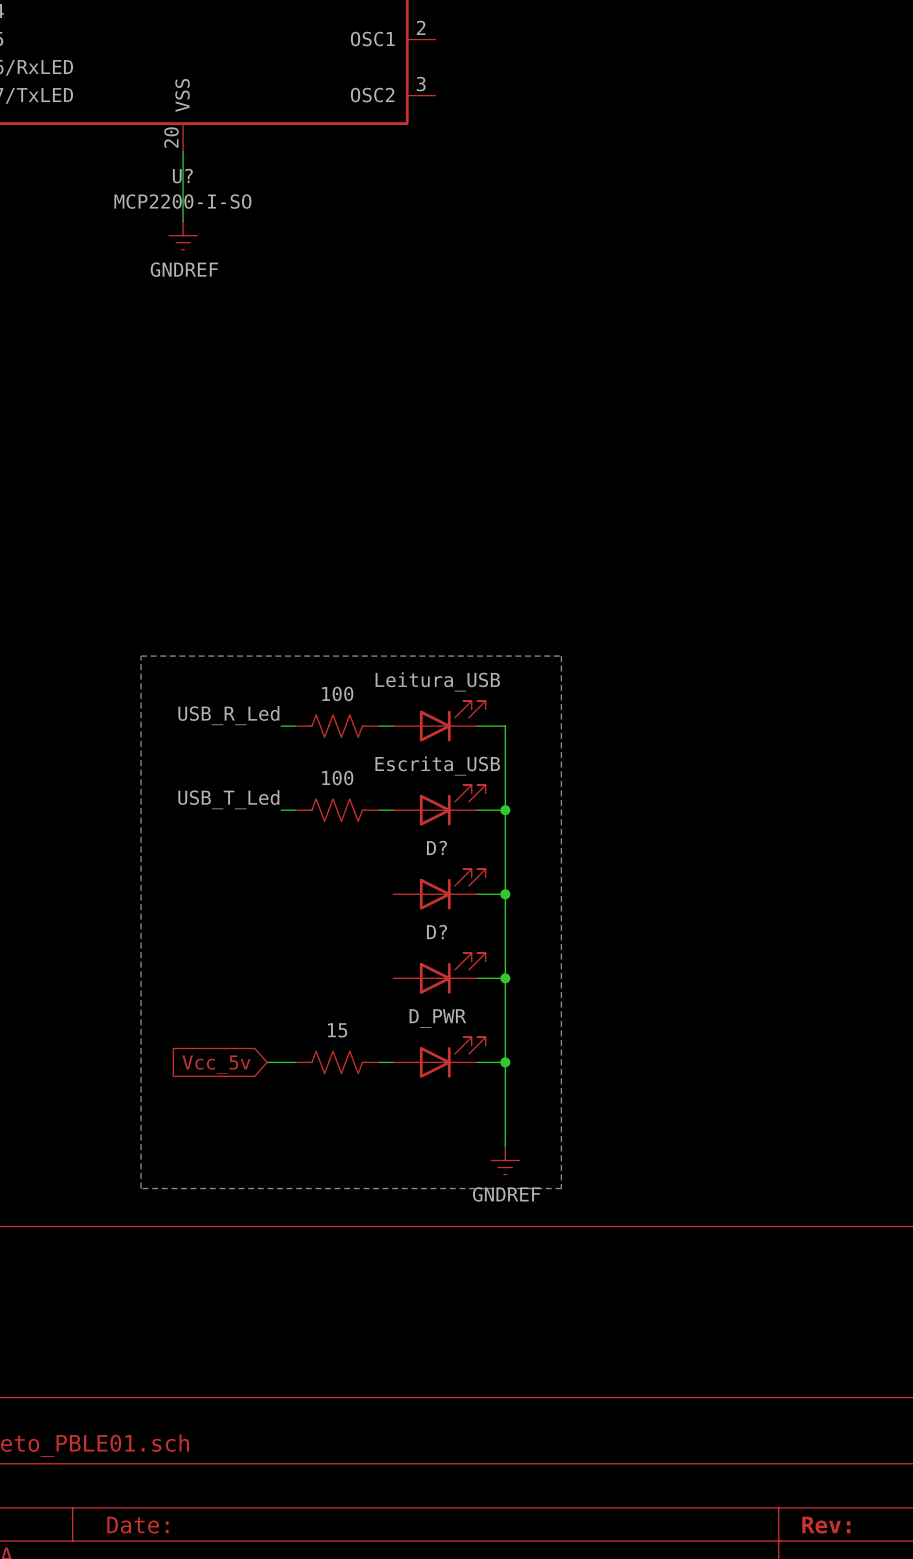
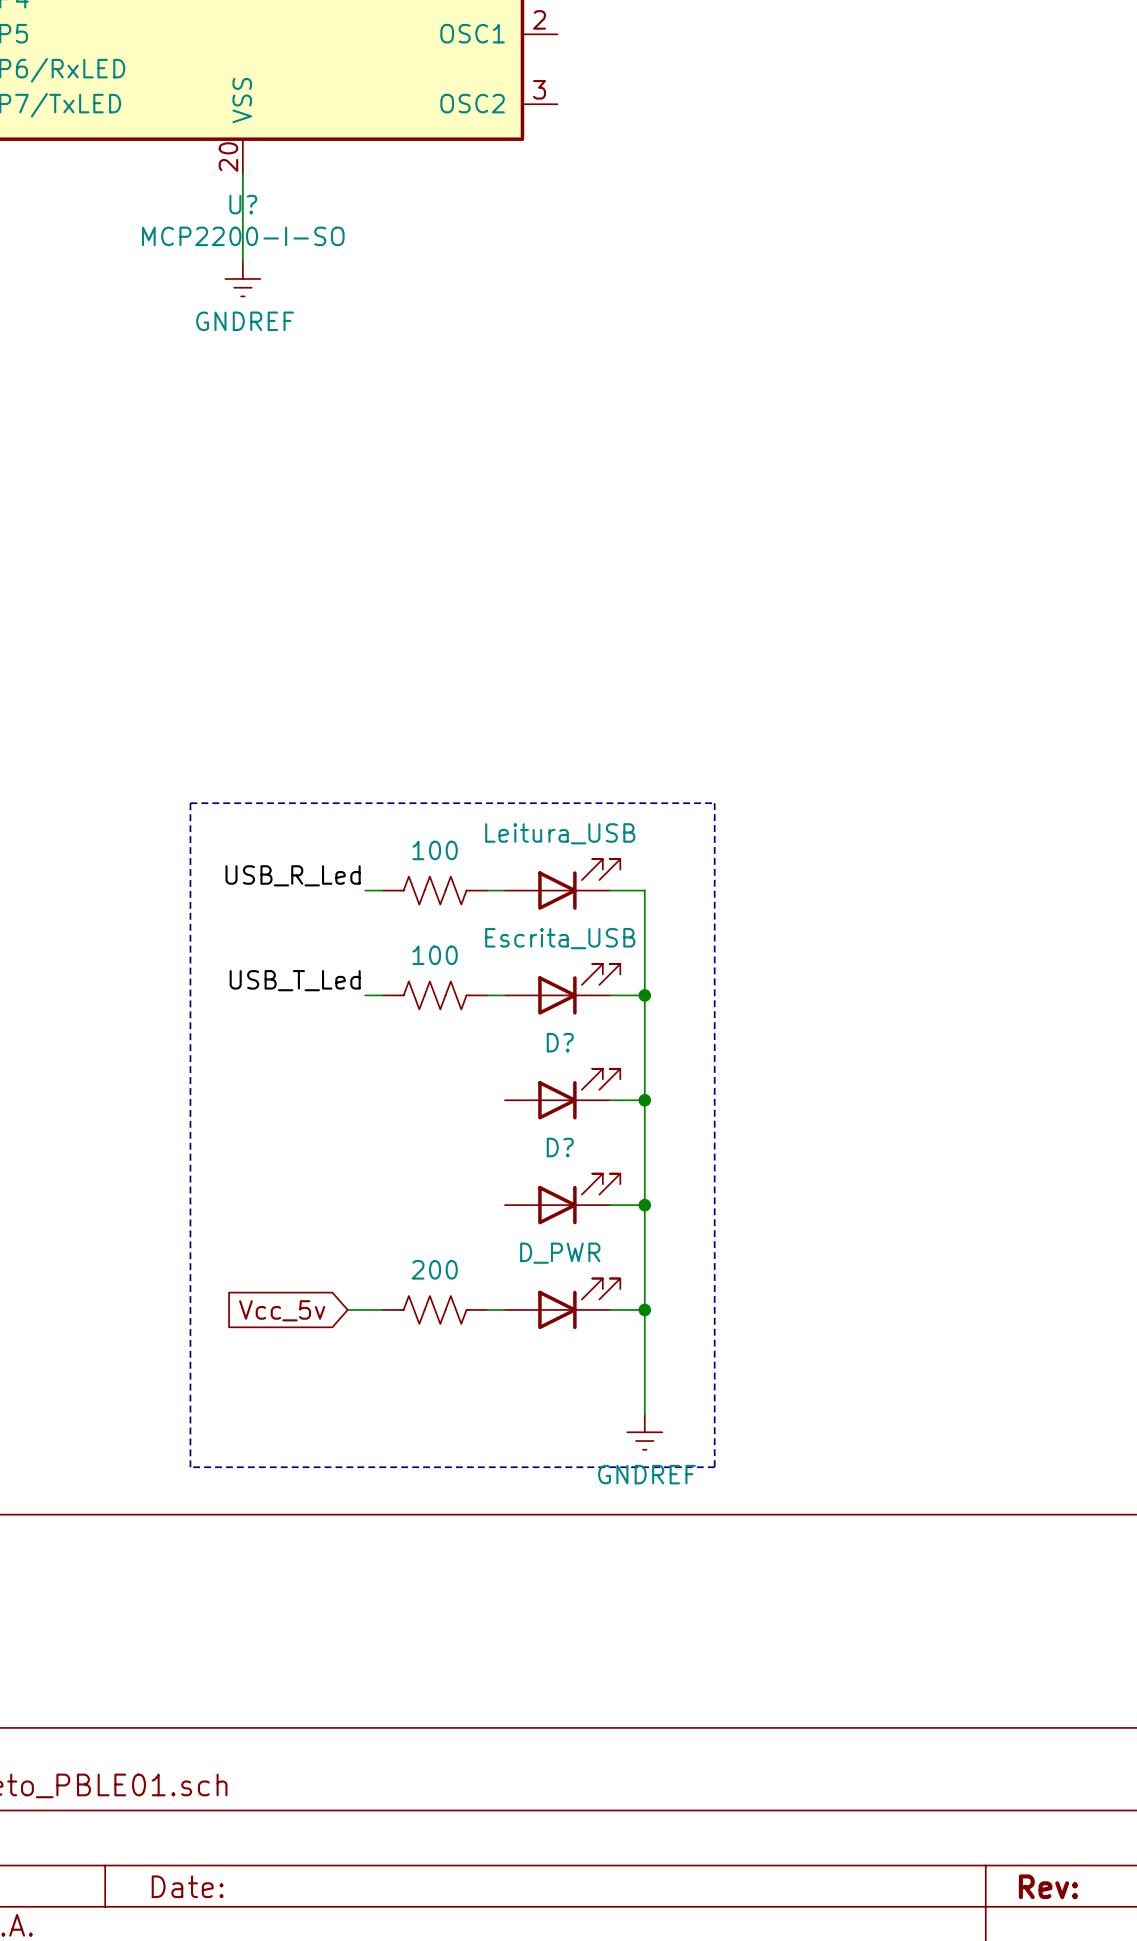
part value: 15 (337, 1030) -> 200 (434, 1269)

